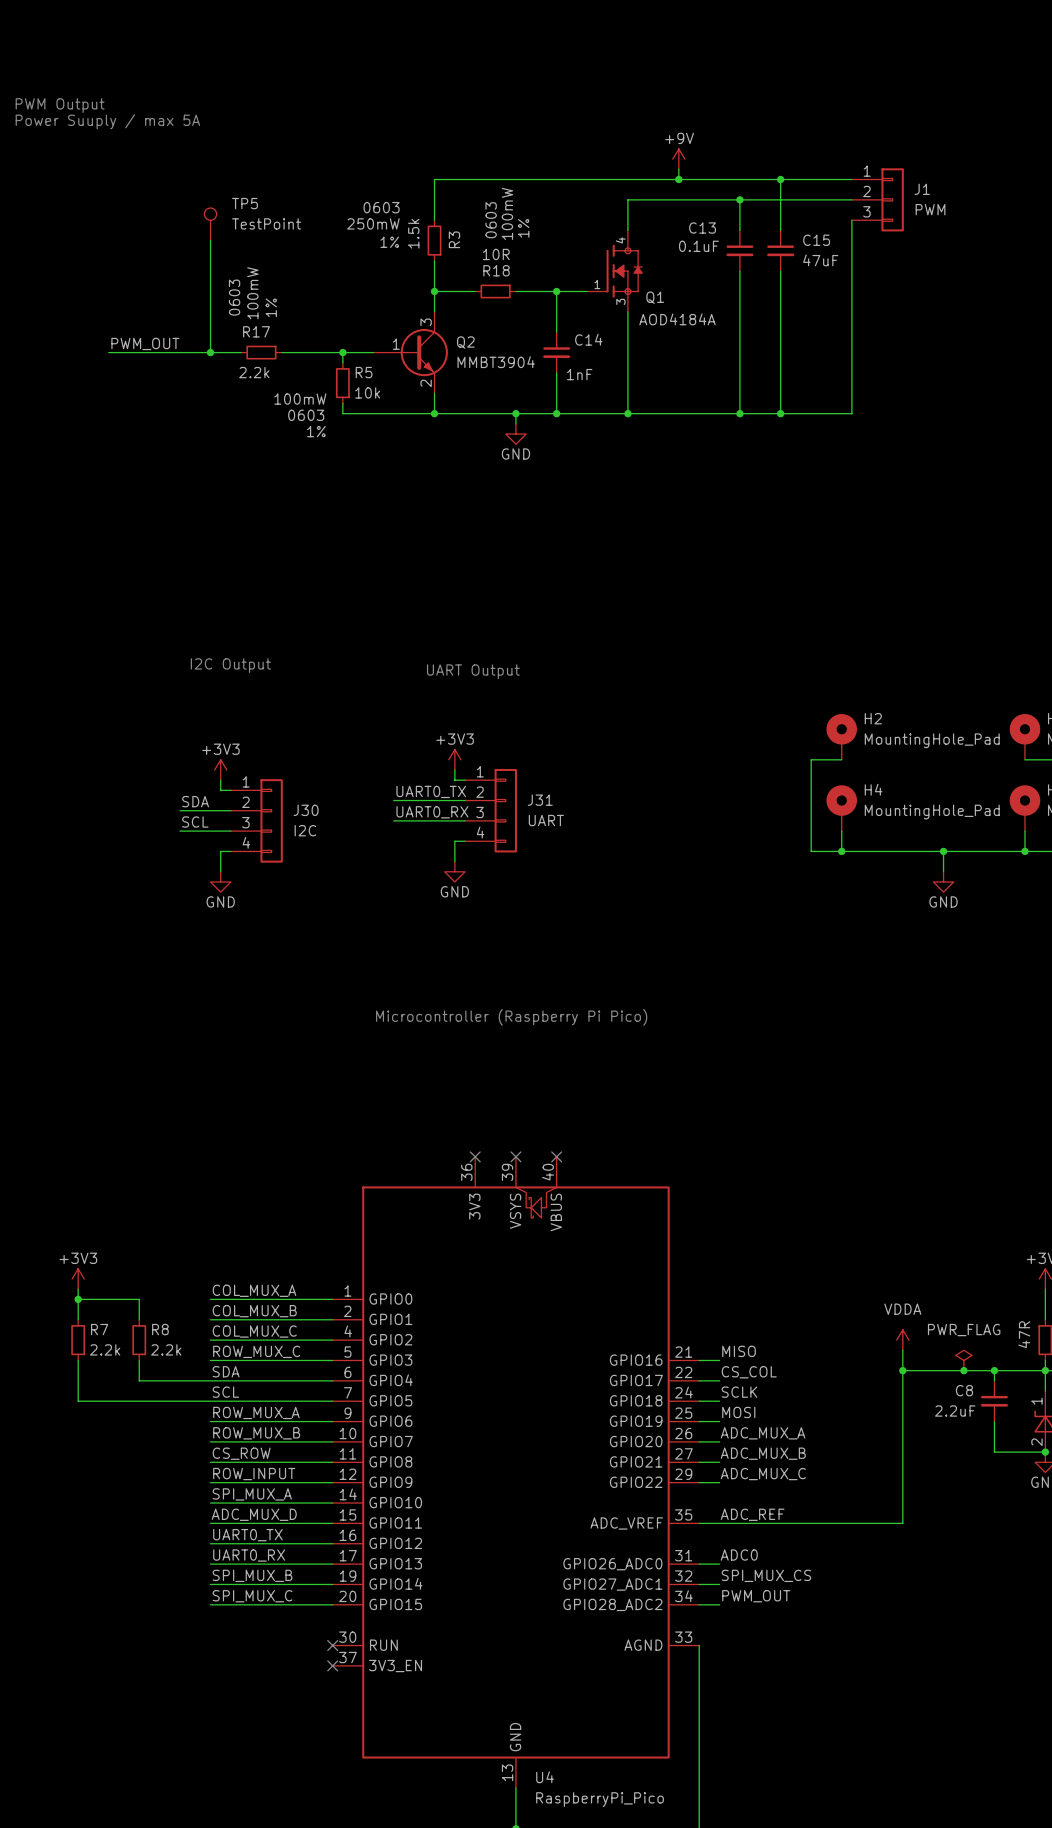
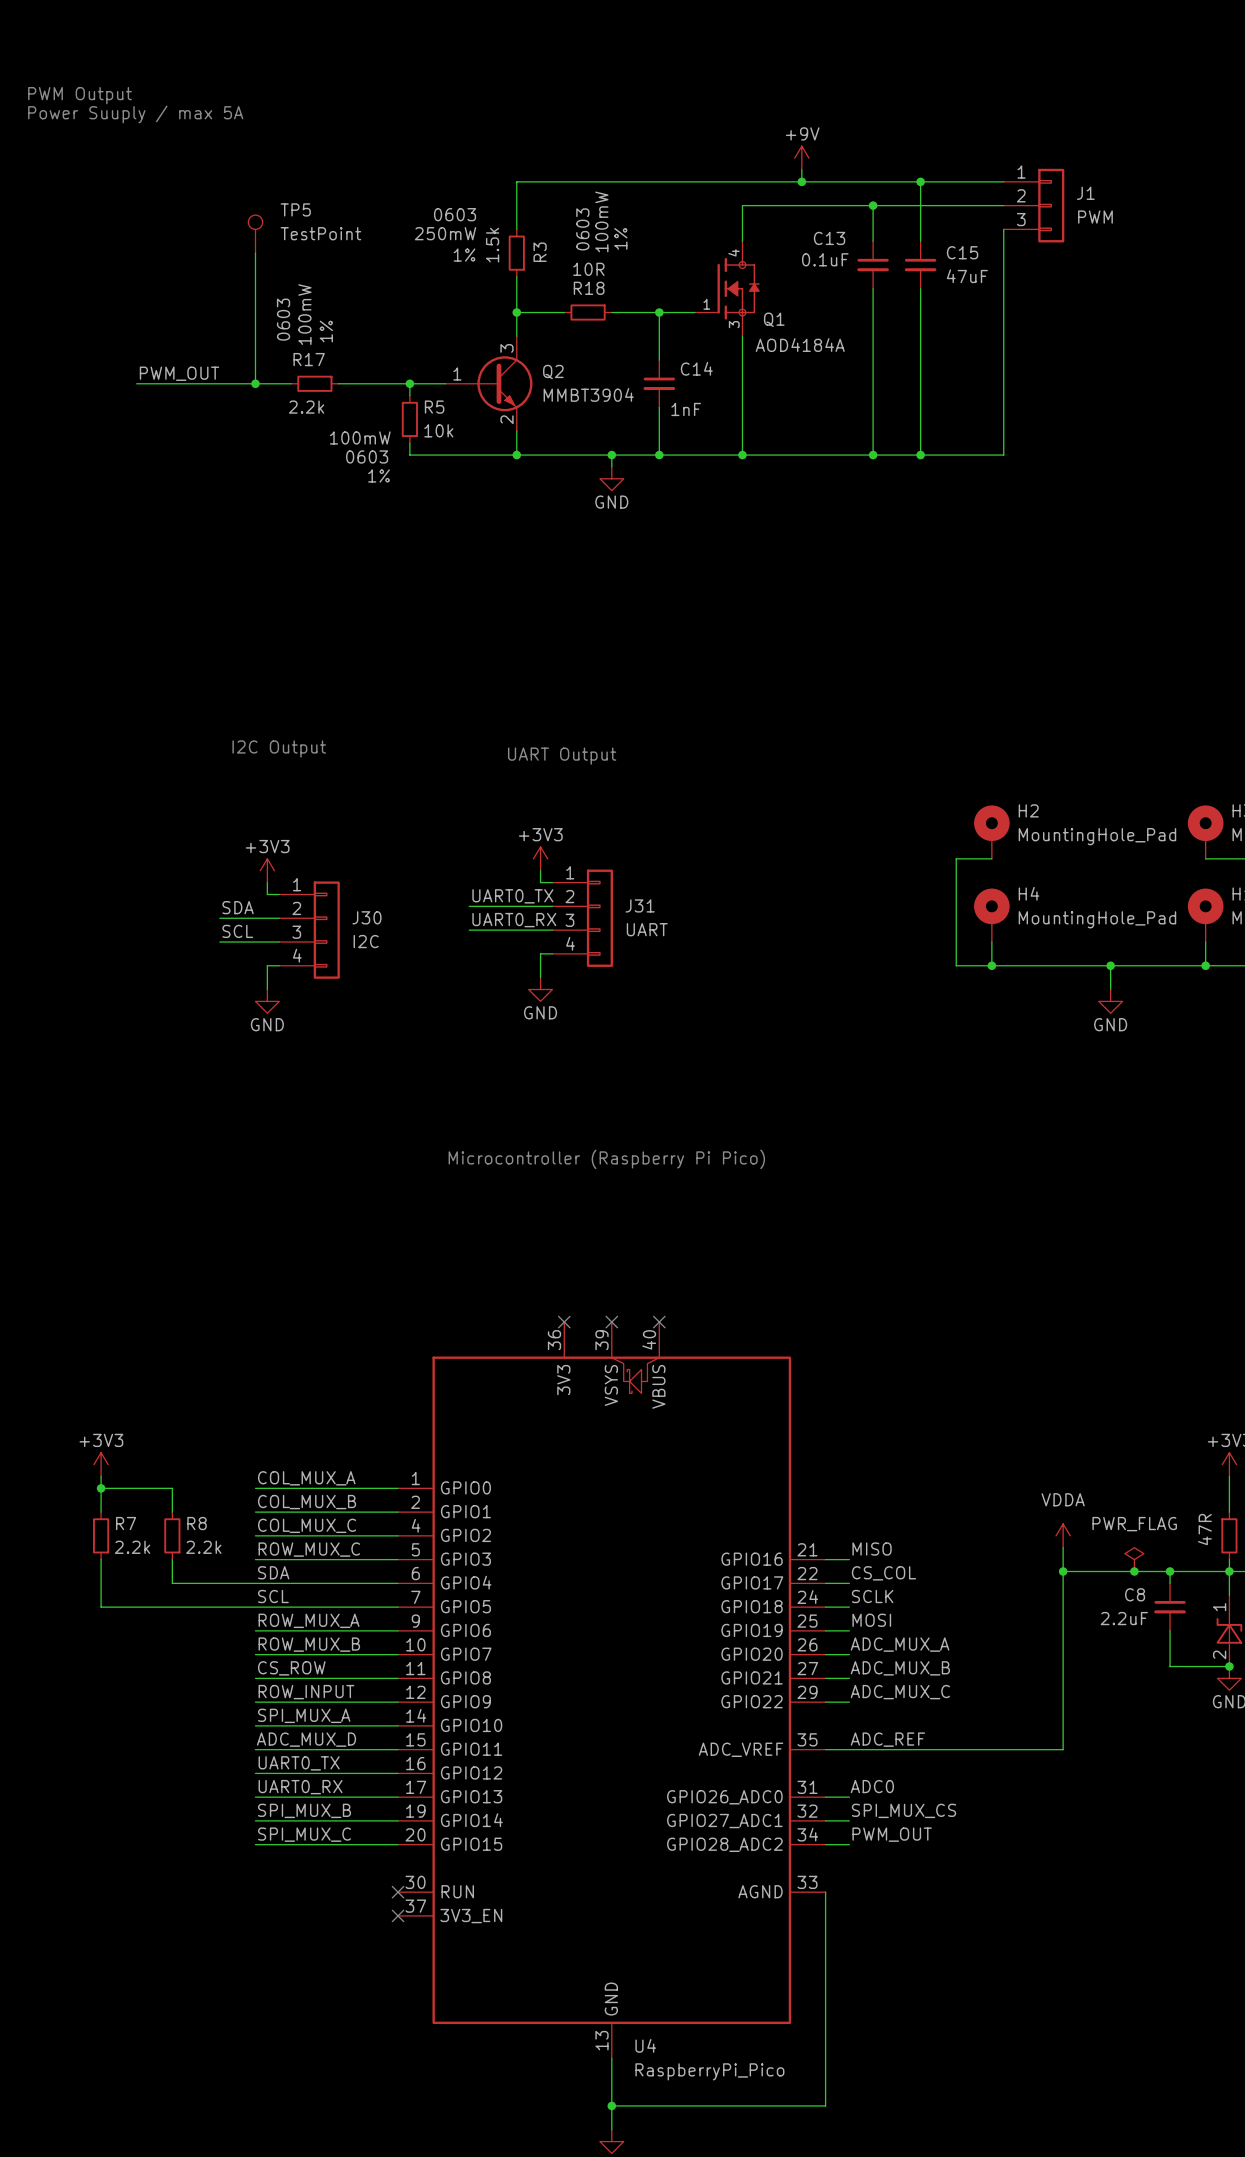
Q2 symbol: [373, 311, 448, 394] -> [445, 336, 533, 432]

